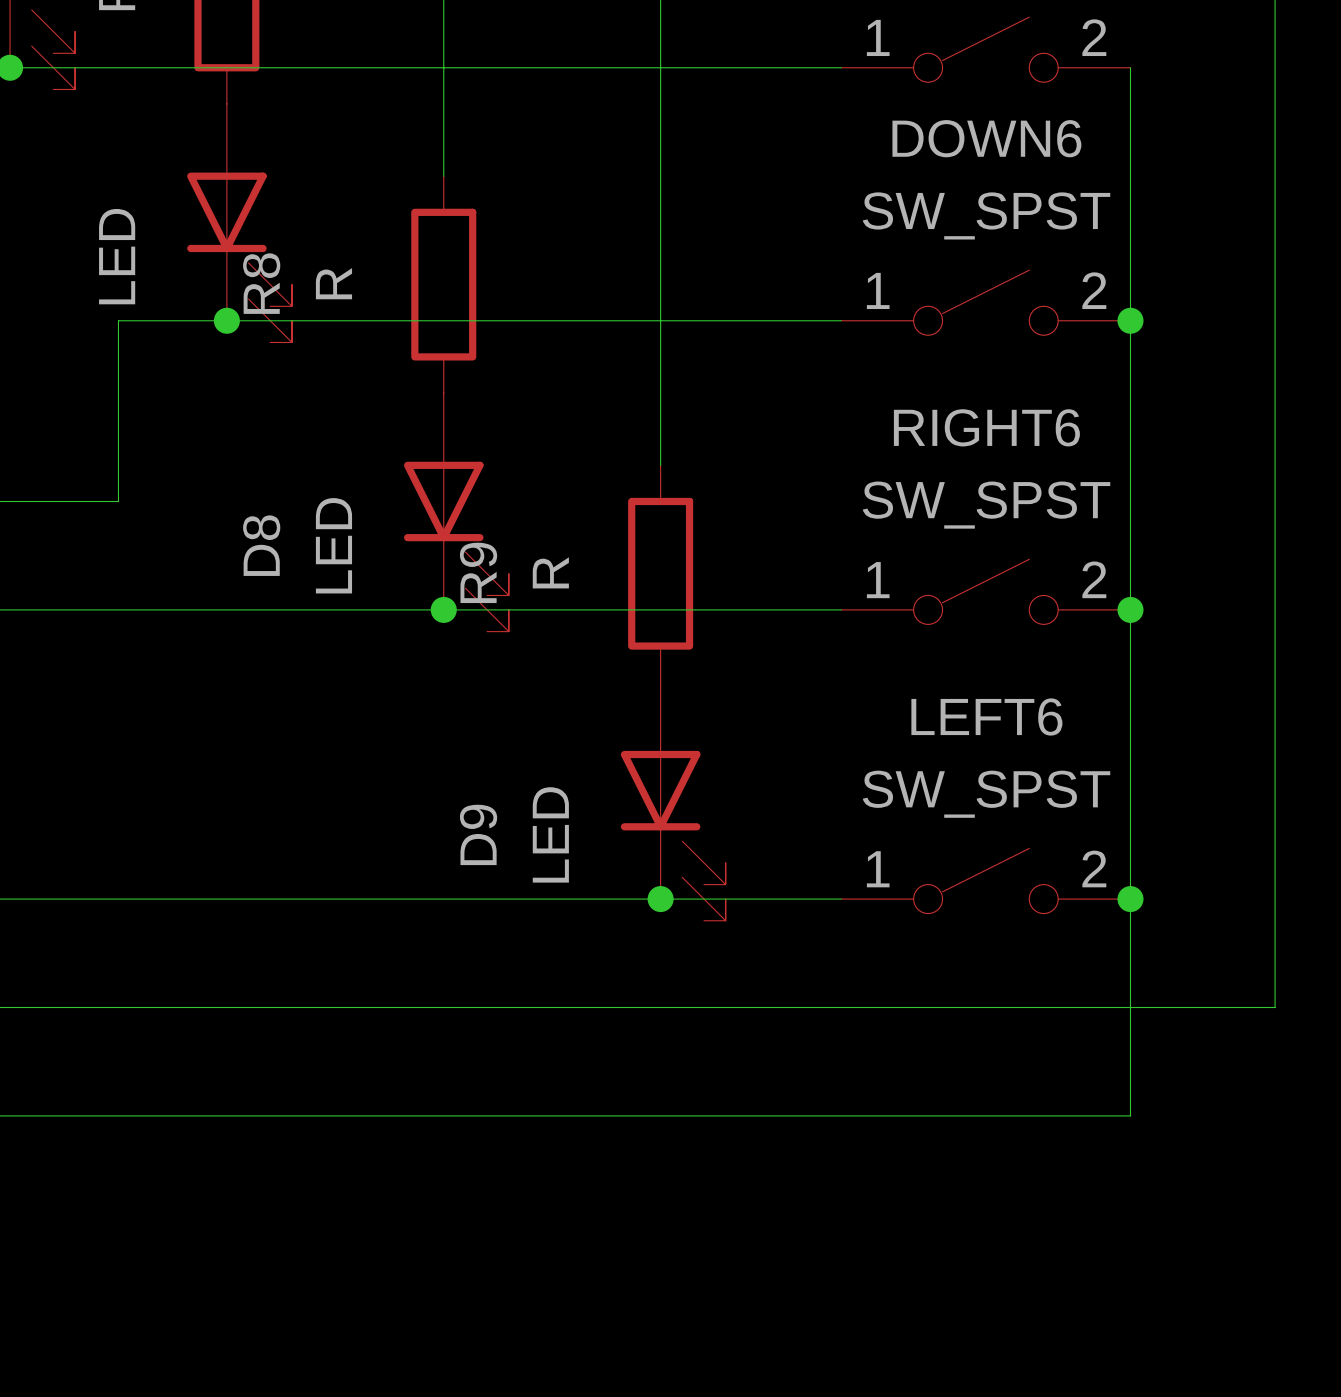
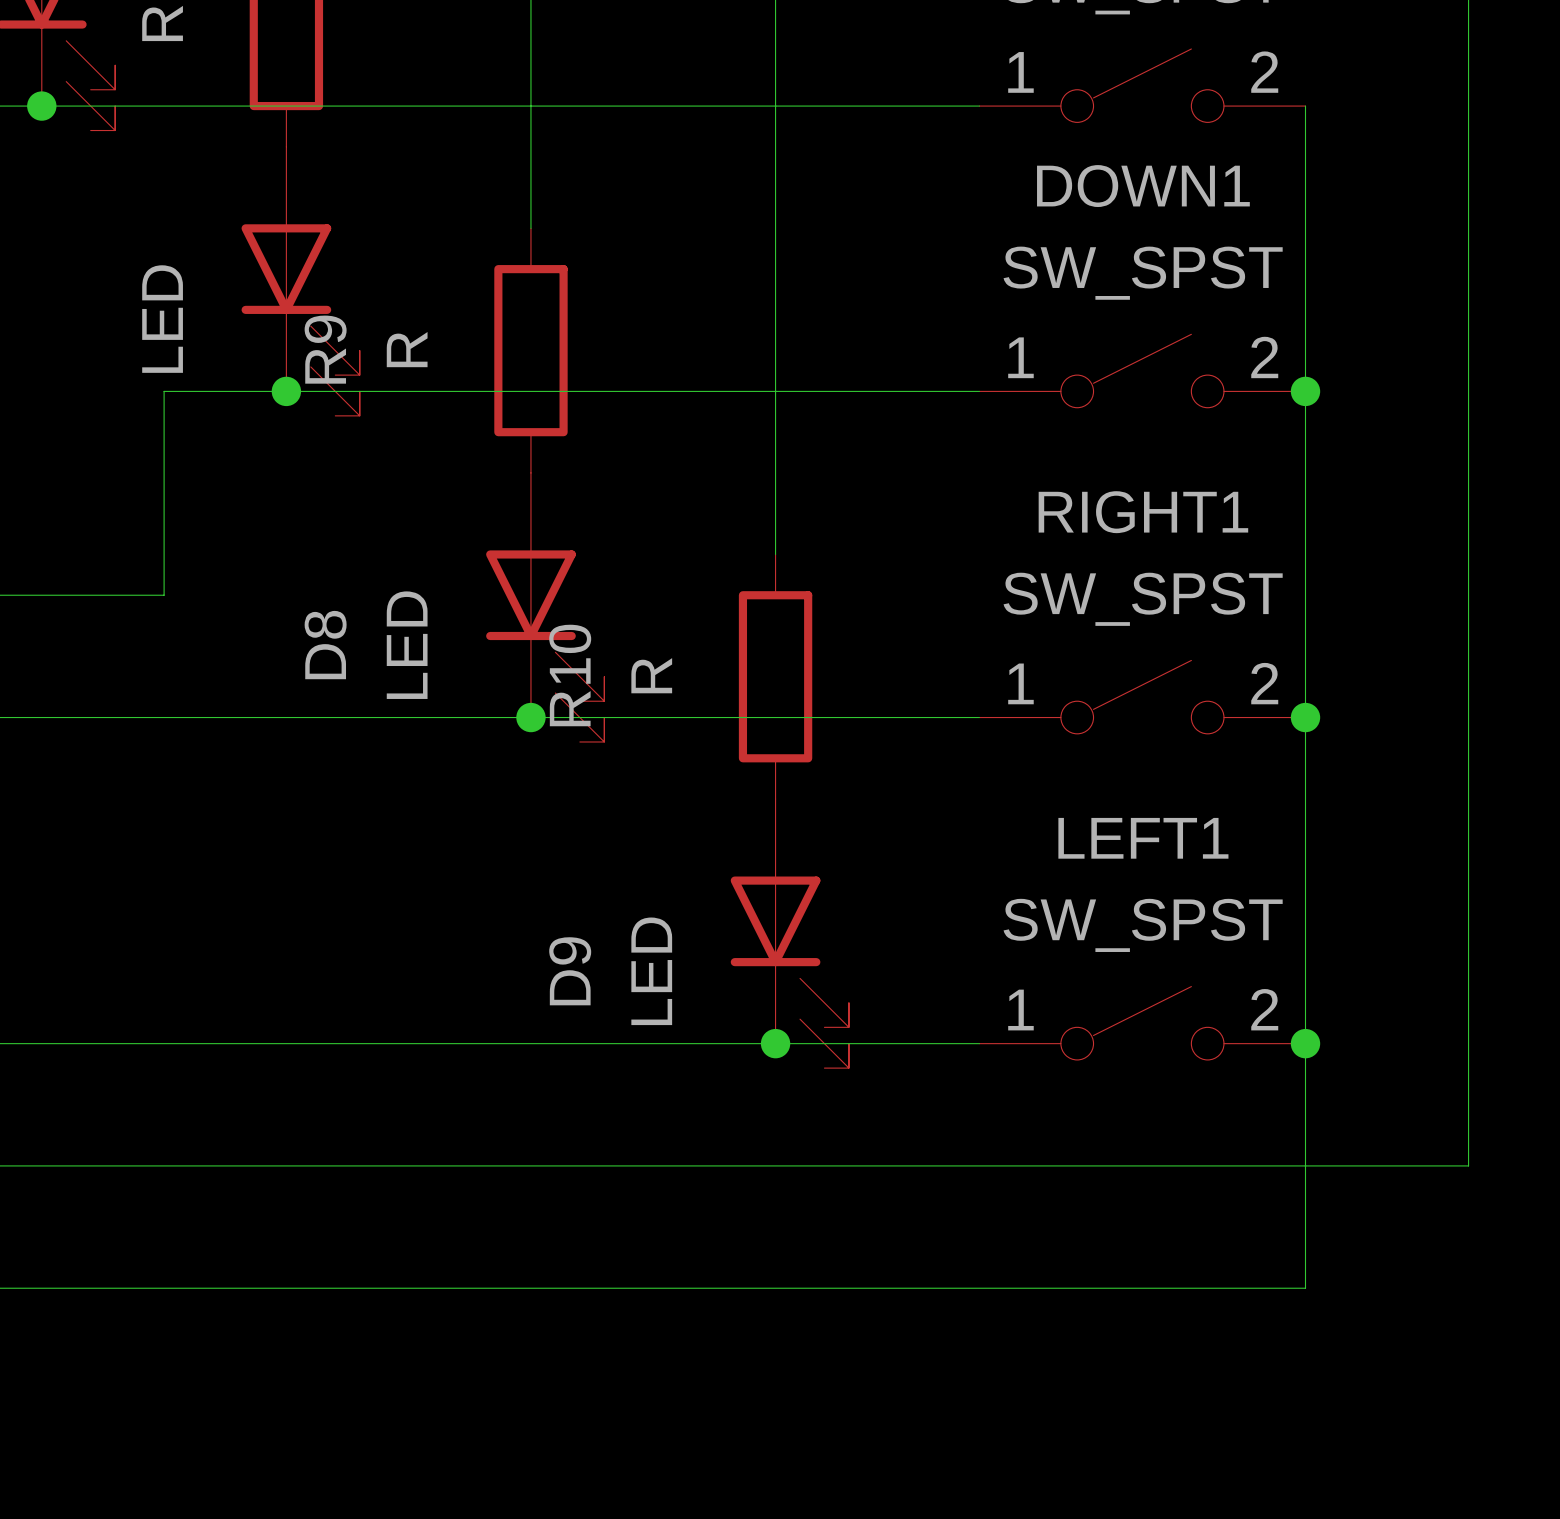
DOWN6 name: DOWN6 (986, 138) -> DOWN1 (1143, 186)
R8 name: R8 (261, 283) -> R9 (325, 349)
RIGHT6 name: RIGHT6 (986, 427) -> RIGHT1 (1143, 512)
R9 name: R9 (478, 572) -> R10 (570, 675)
LEFT6 name: LEFT6 (986, 716) -> LEFT1 (1143, 838)

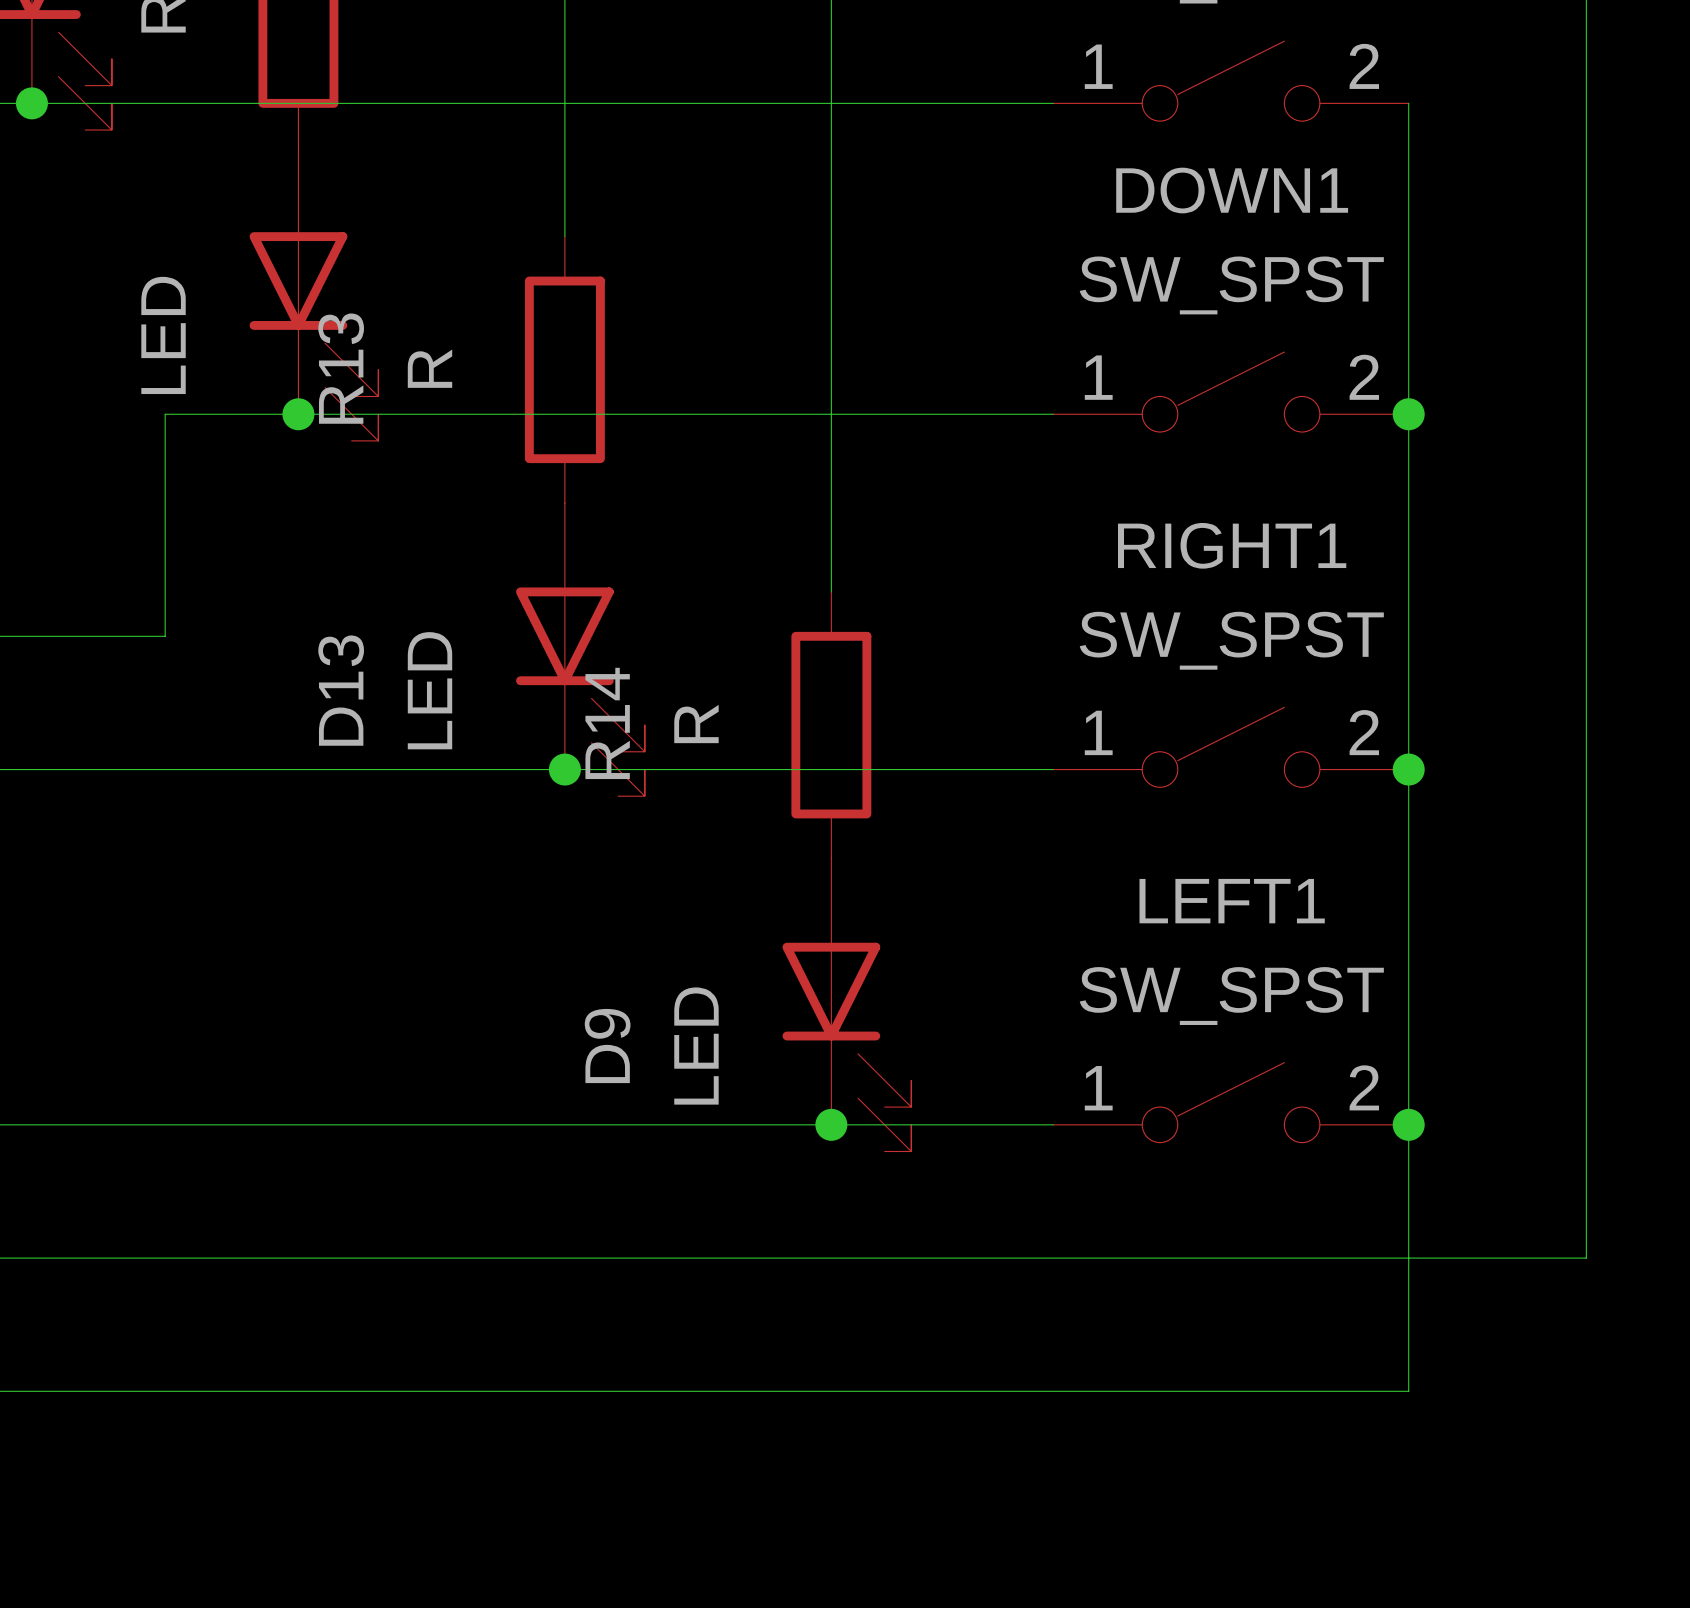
R9 name: R9 (325, 349) -> R13 (341, 368)
D8 name: D8 (325, 645) -> D13 (341, 690)
R10 name: R10 (570, 675) -> R14 (607, 723)

